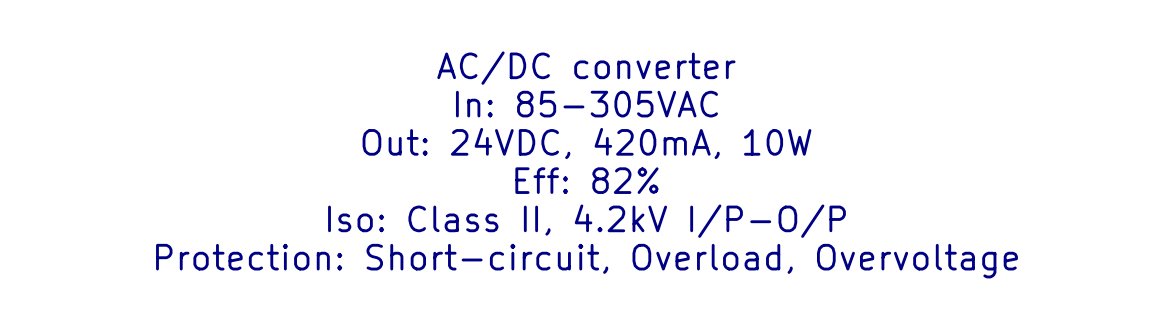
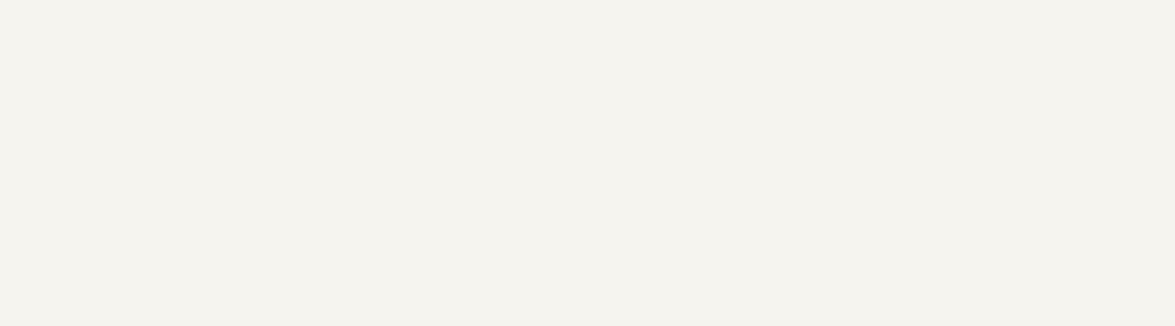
text: AC/DC converter (586, 68) -> none
text: In: 85-305VAC (586, 104) -> none
text: Out: 24VDC, 420mA, 10W (586, 143) -> none
text: Eff: 82% (586, 180) -> none
text: Iso: Class II, 4.2kV I/P-O/P (586, 221) -> none
text: Protection: Short-circuit, Overload, Overvoltage (586, 261) -> none

